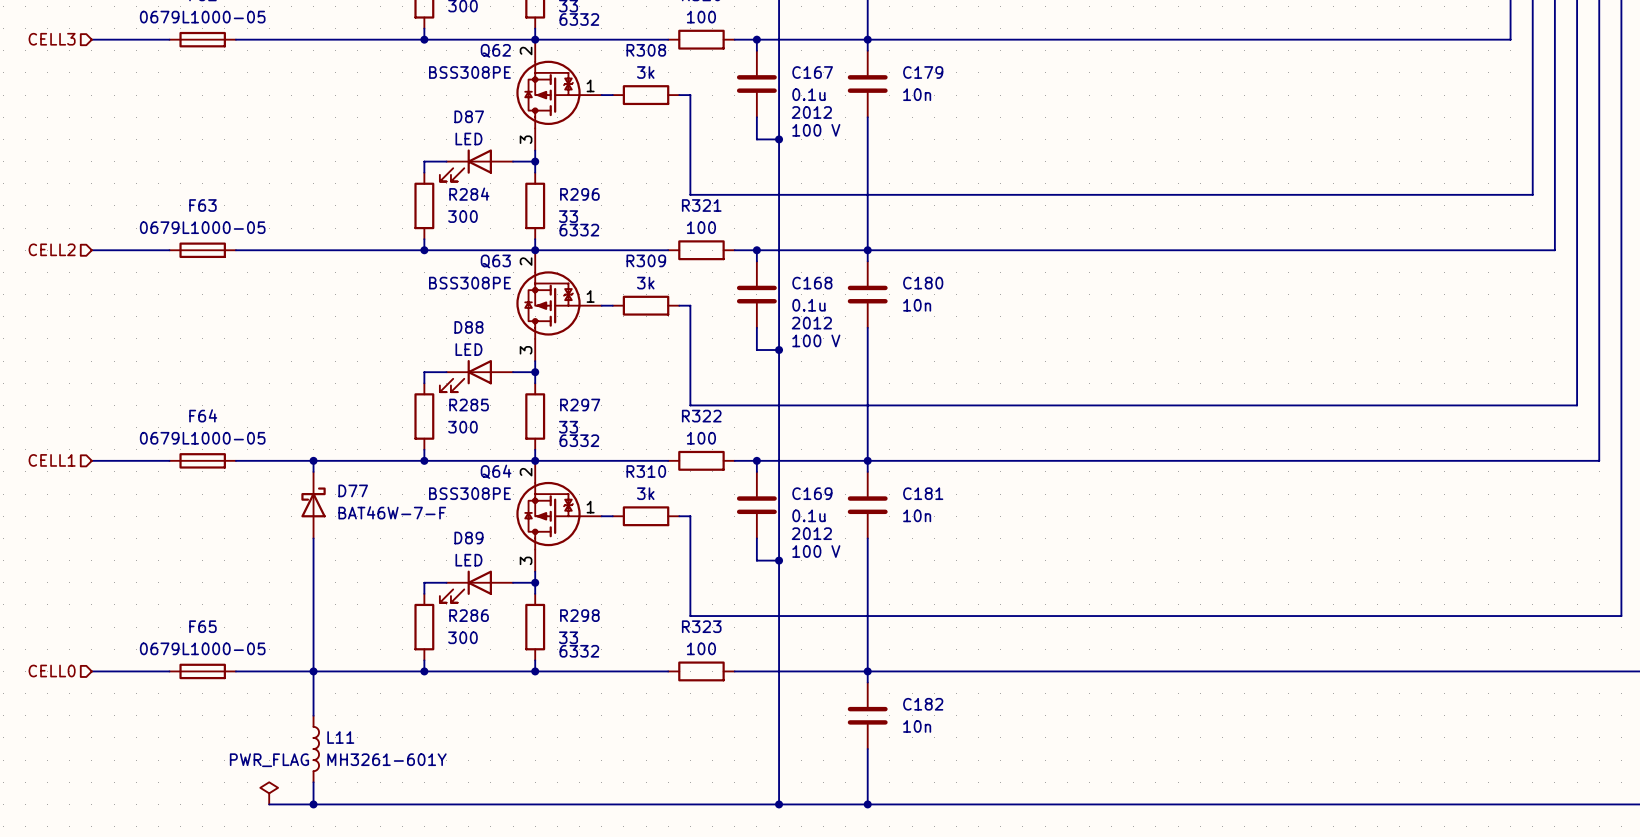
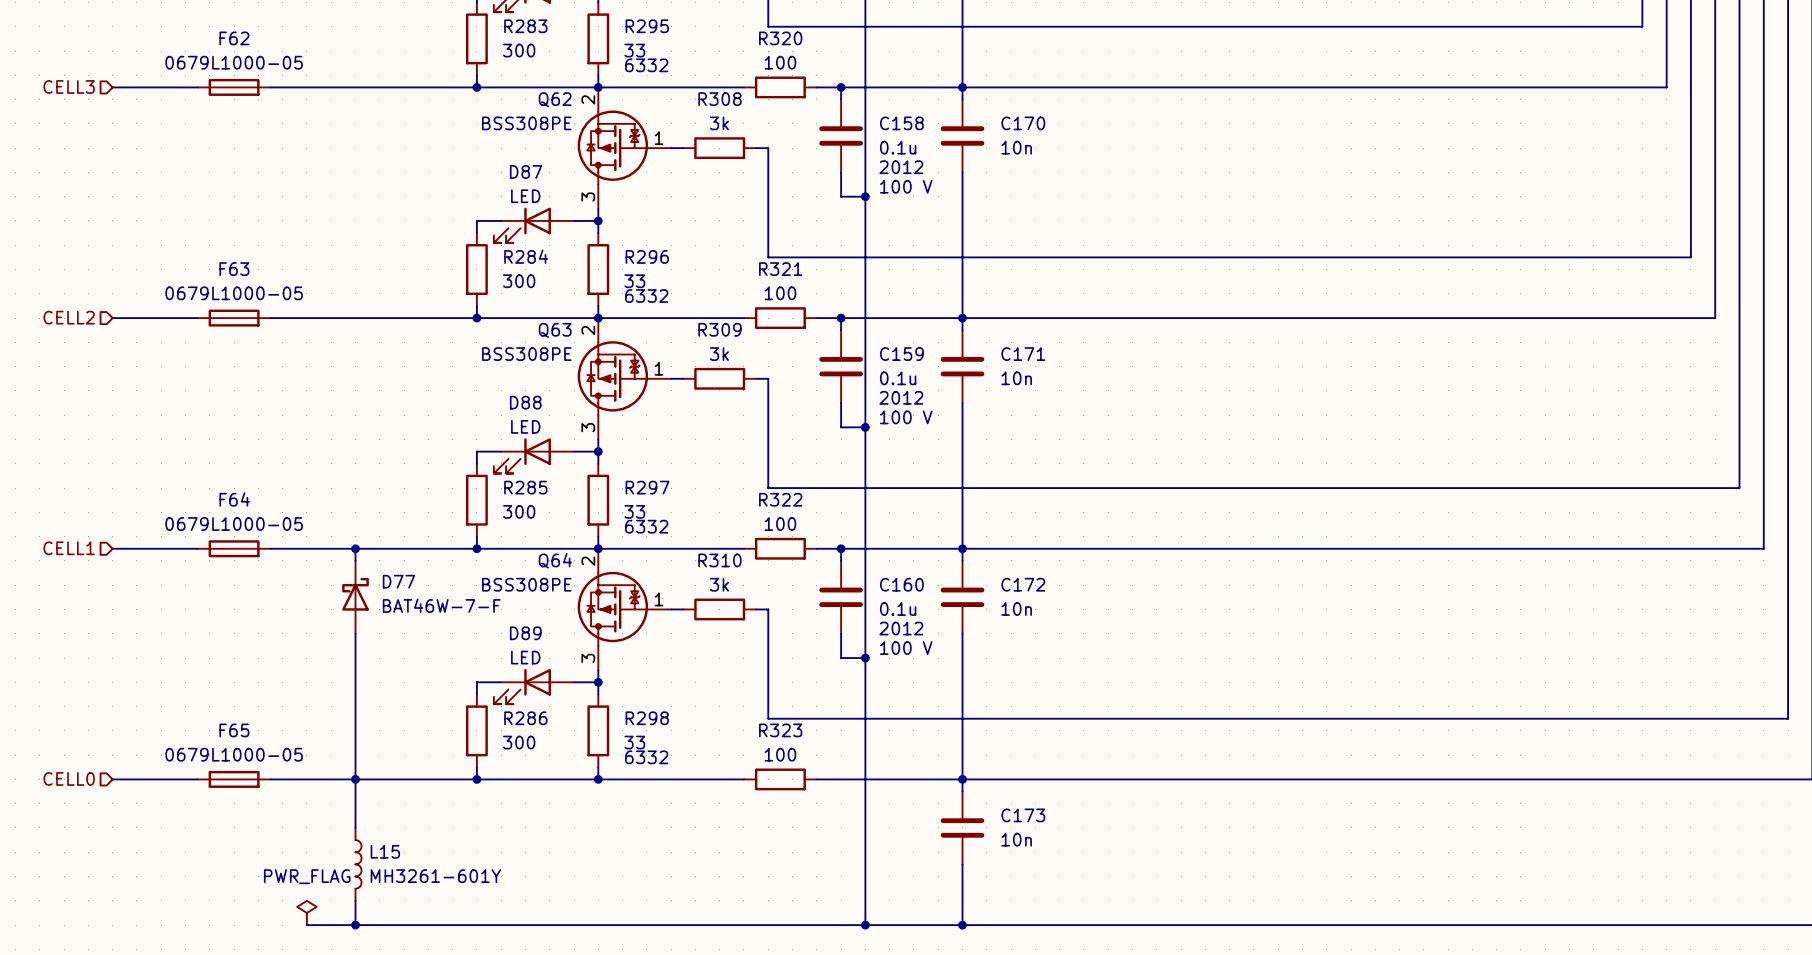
C167 name: C167 (812, 72) -> C158 (901, 123)
C179 name: C179 (923, 72) -> C170 (1023, 123)
C168 name: C168 (812, 283) -> C159 (901, 354)
C180 name: C180 (923, 283) -> C171 (1023, 354)
C169 name: C169 (812, 493) -> C160 (901, 584)
C181 name: C181 (923, 493) -> C172 (1023, 584)
C182 name: C182 (923, 704) -> C173 (1023, 815)
L11 name: L11 (340, 737) -> L15 (385, 851)

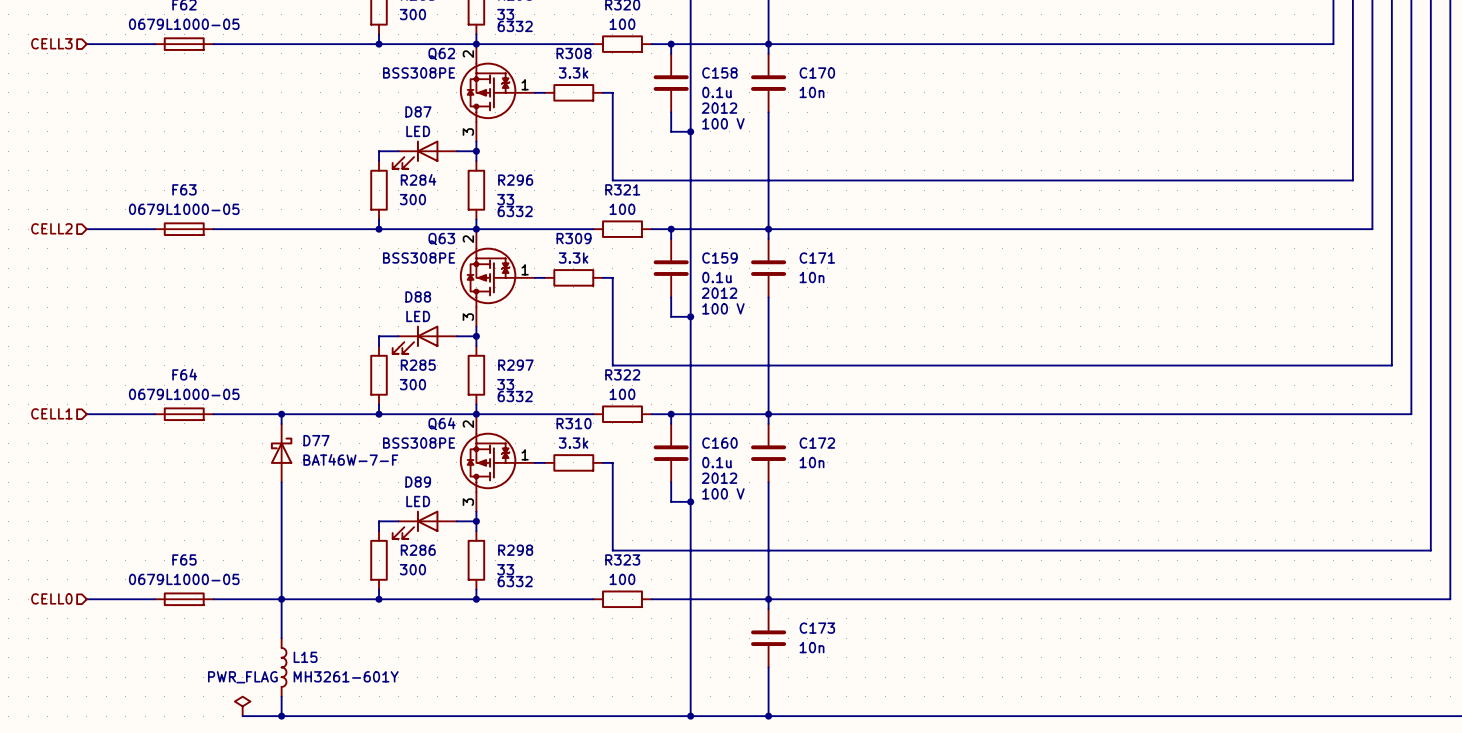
R308 value: 3k (719, 123) -> 3.3k (573, 72)
R309 value: 3k (719, 354) -> 3.3k (573, 258)
R310 value: 3k (719, 584) -> 3.3k (573, 443)

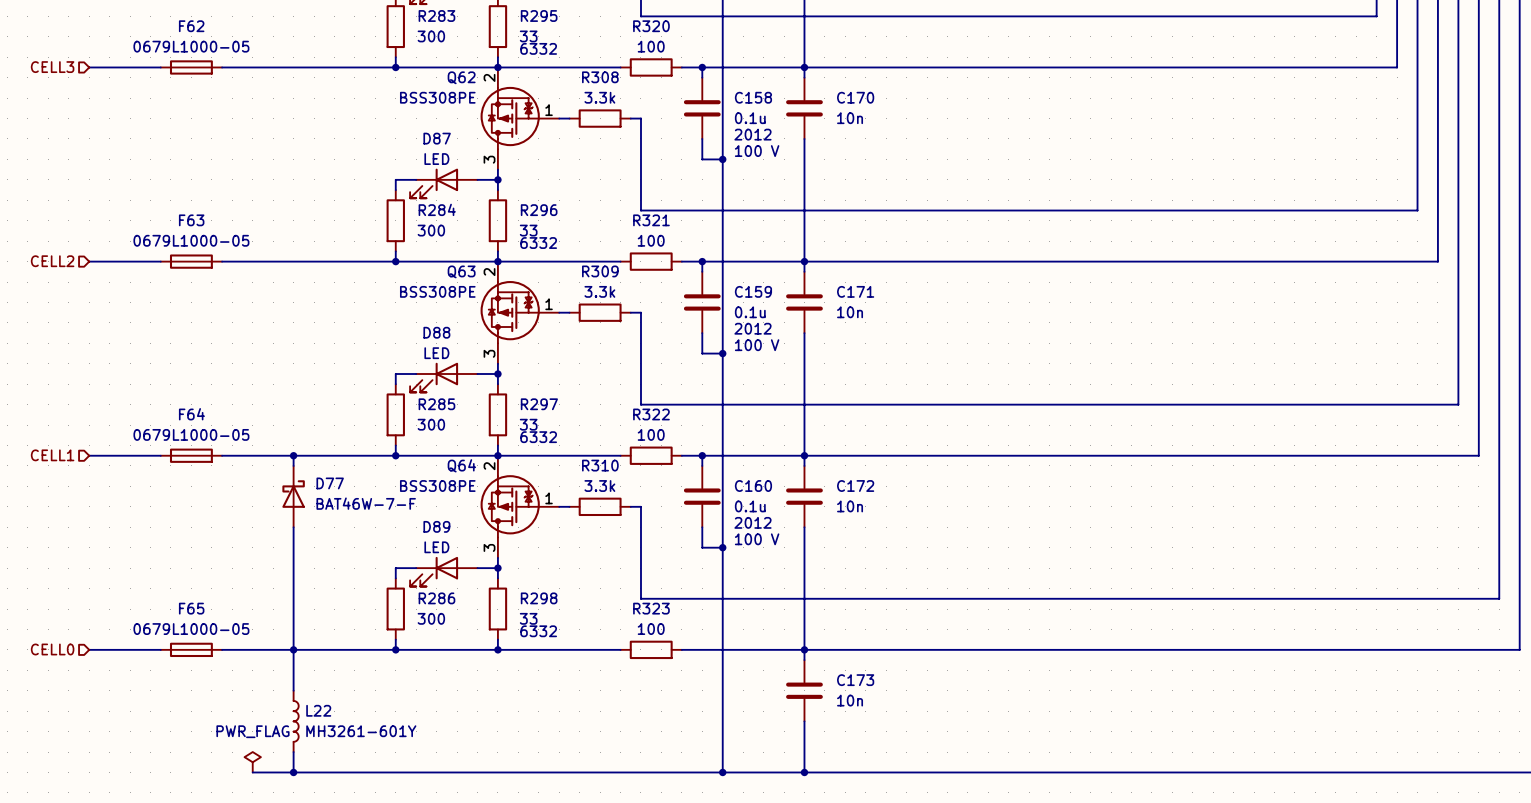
L15 name: L15 (305, 657) -> L22 (318, 710)

